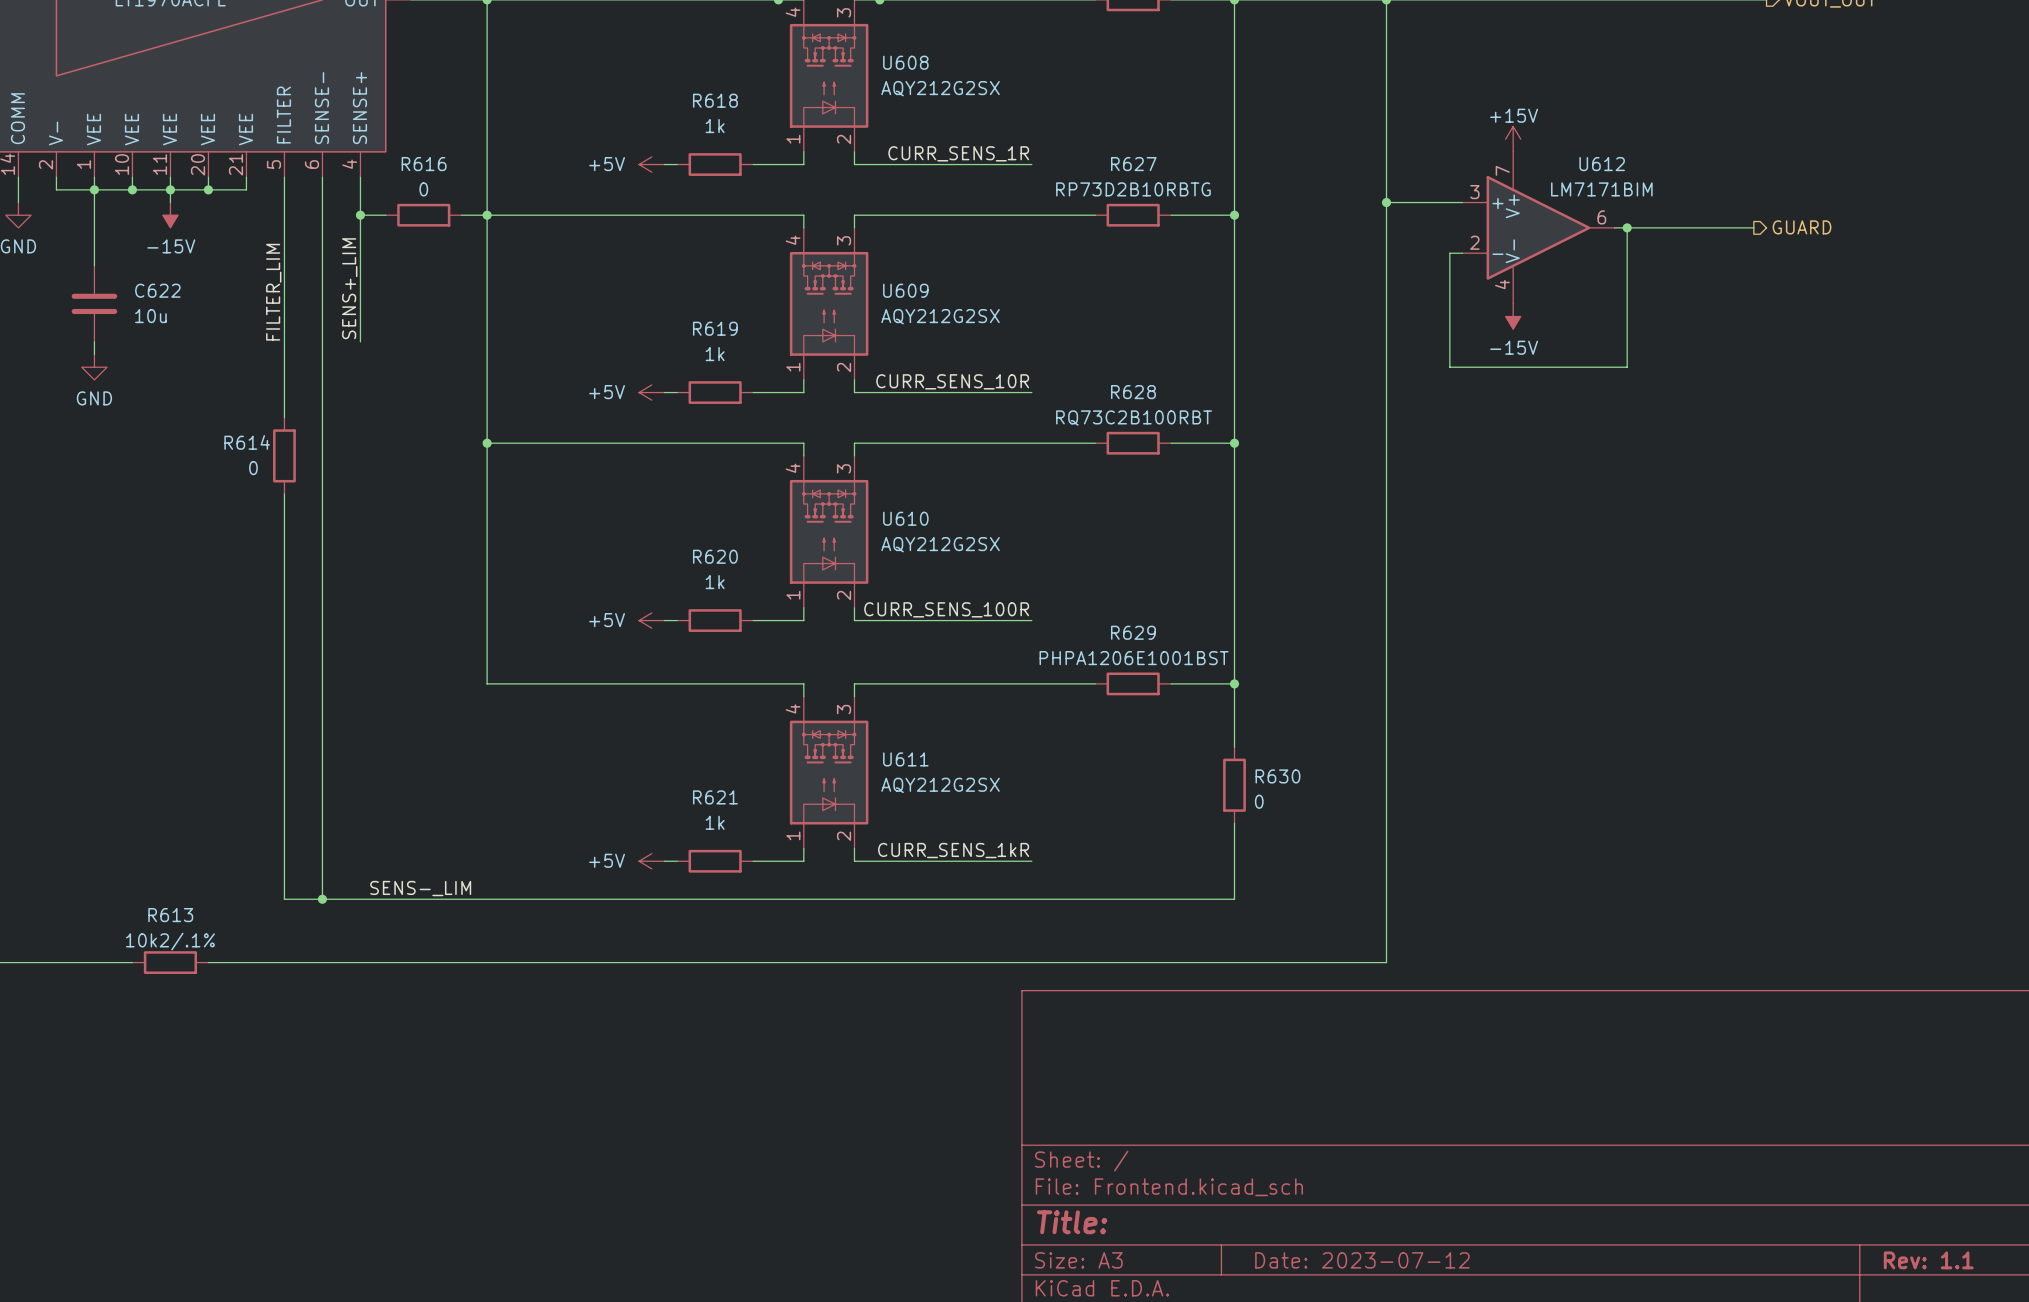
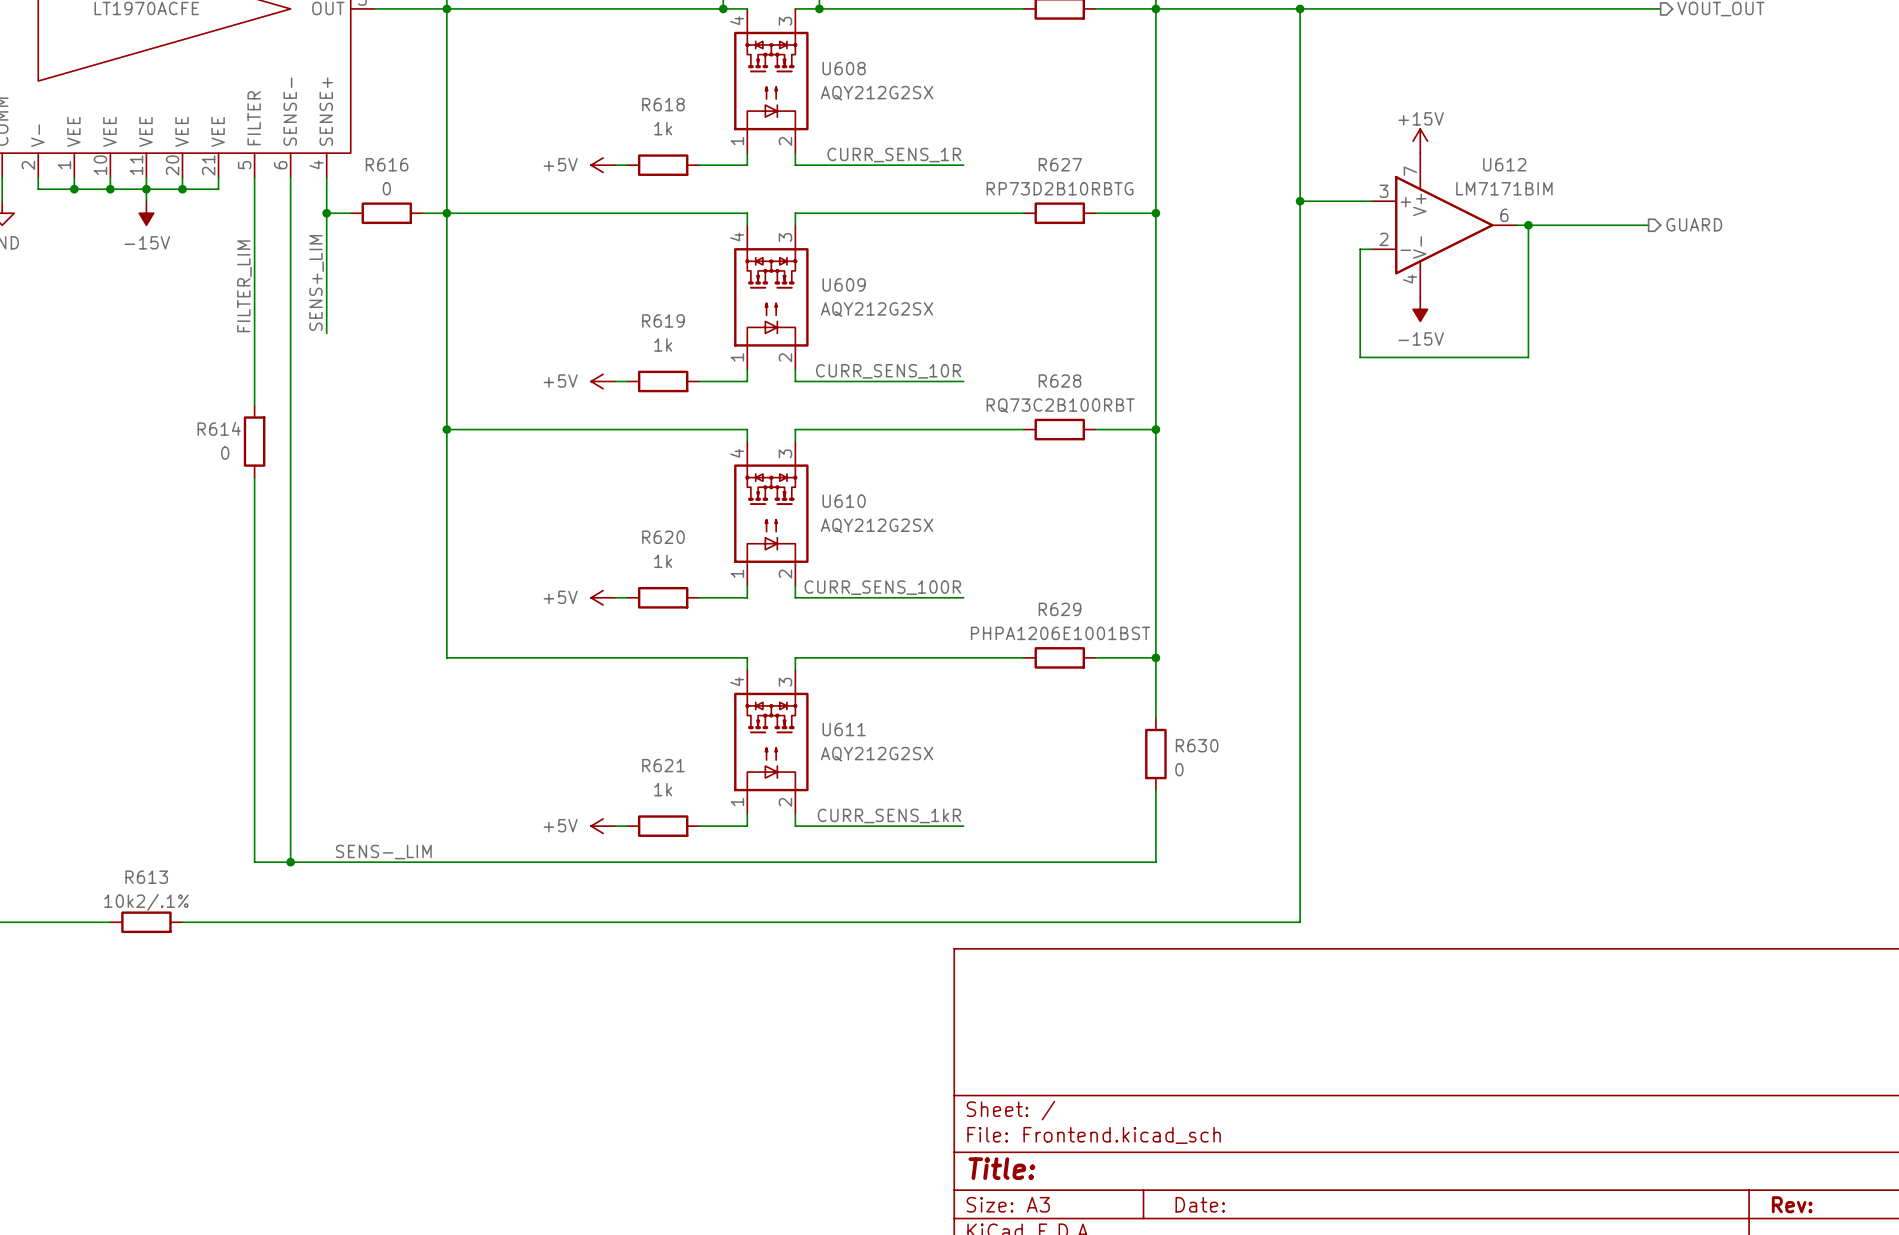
wire: (94, 189) (94, 265) -> none
C622: 10u (94, 303) -> none
wire: (94, 341) (94, 354) -> none
power symbol: GND (94, 367) -> none
title block: Date: 2023-07-12 (1362, 1260) -> Date: (1200, 1204)
title block: Rev: 1.1 (1928, 1260) -> Rev: (1792, 1204)

